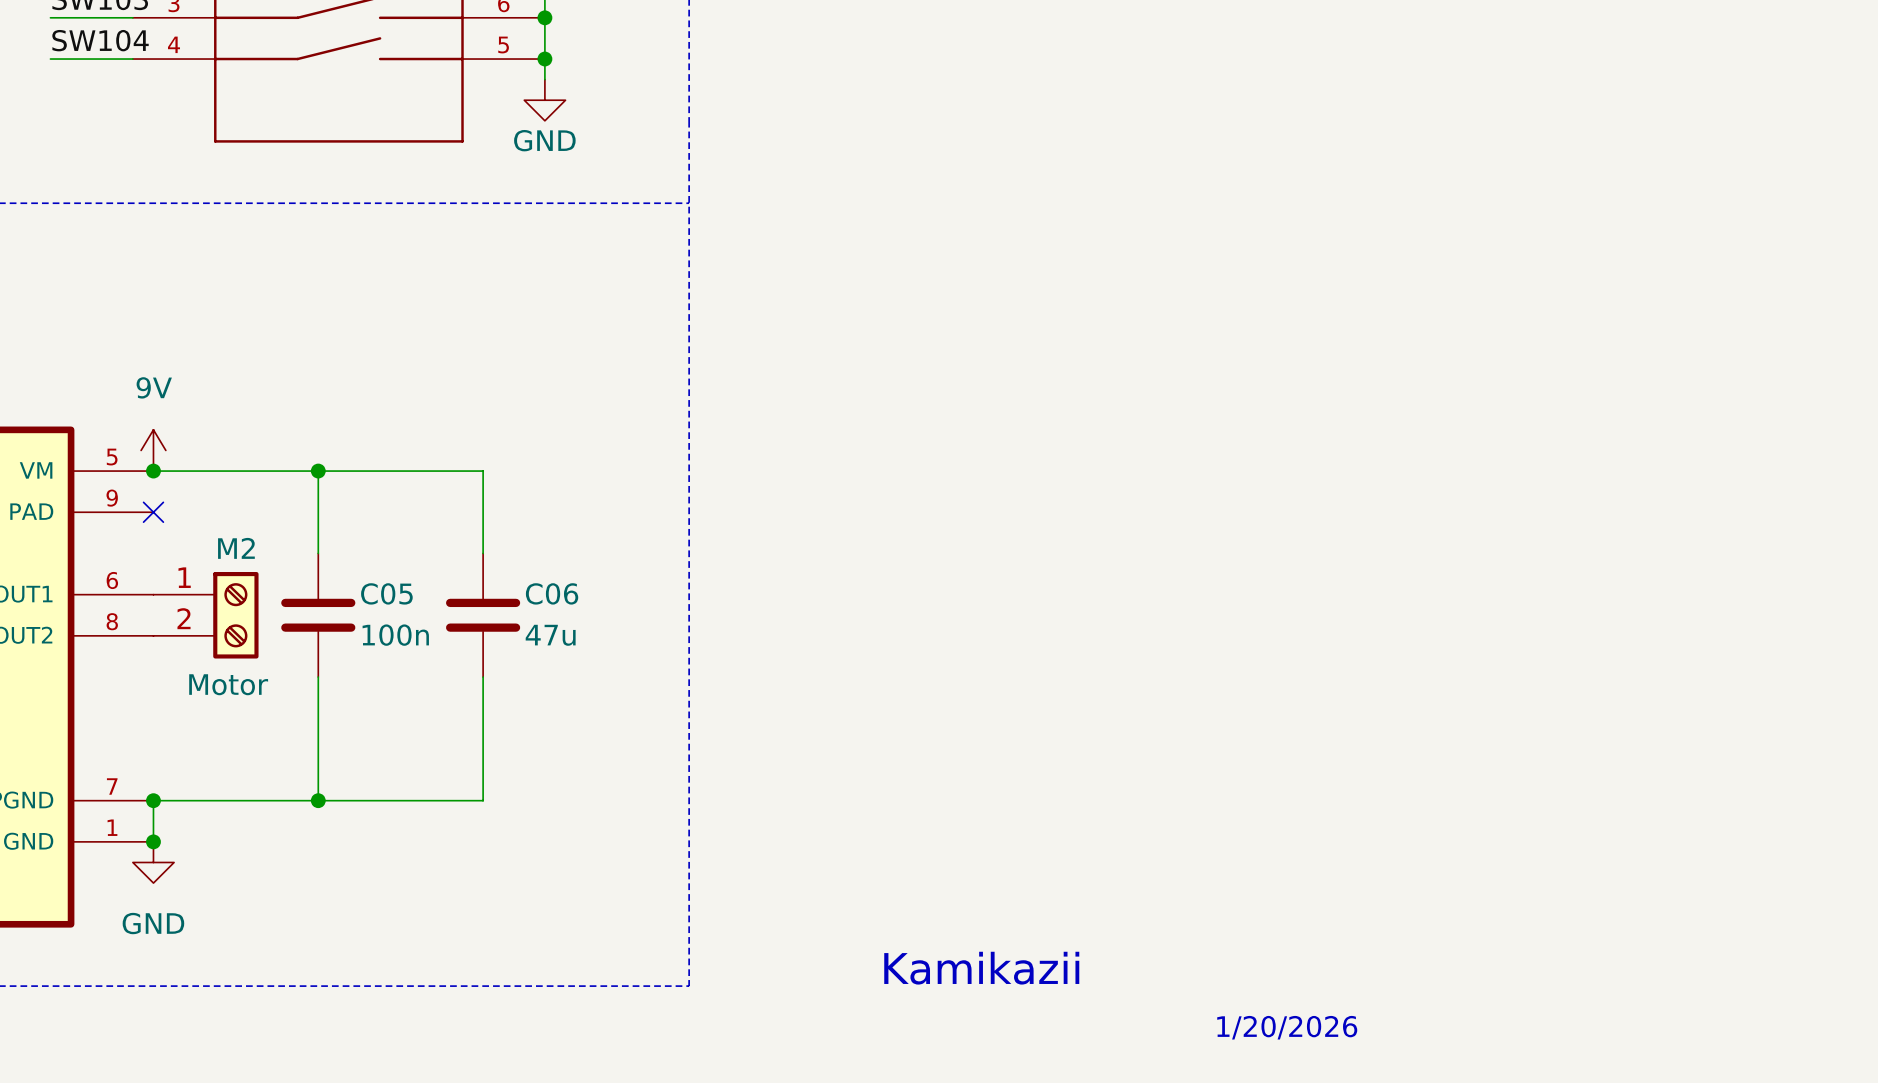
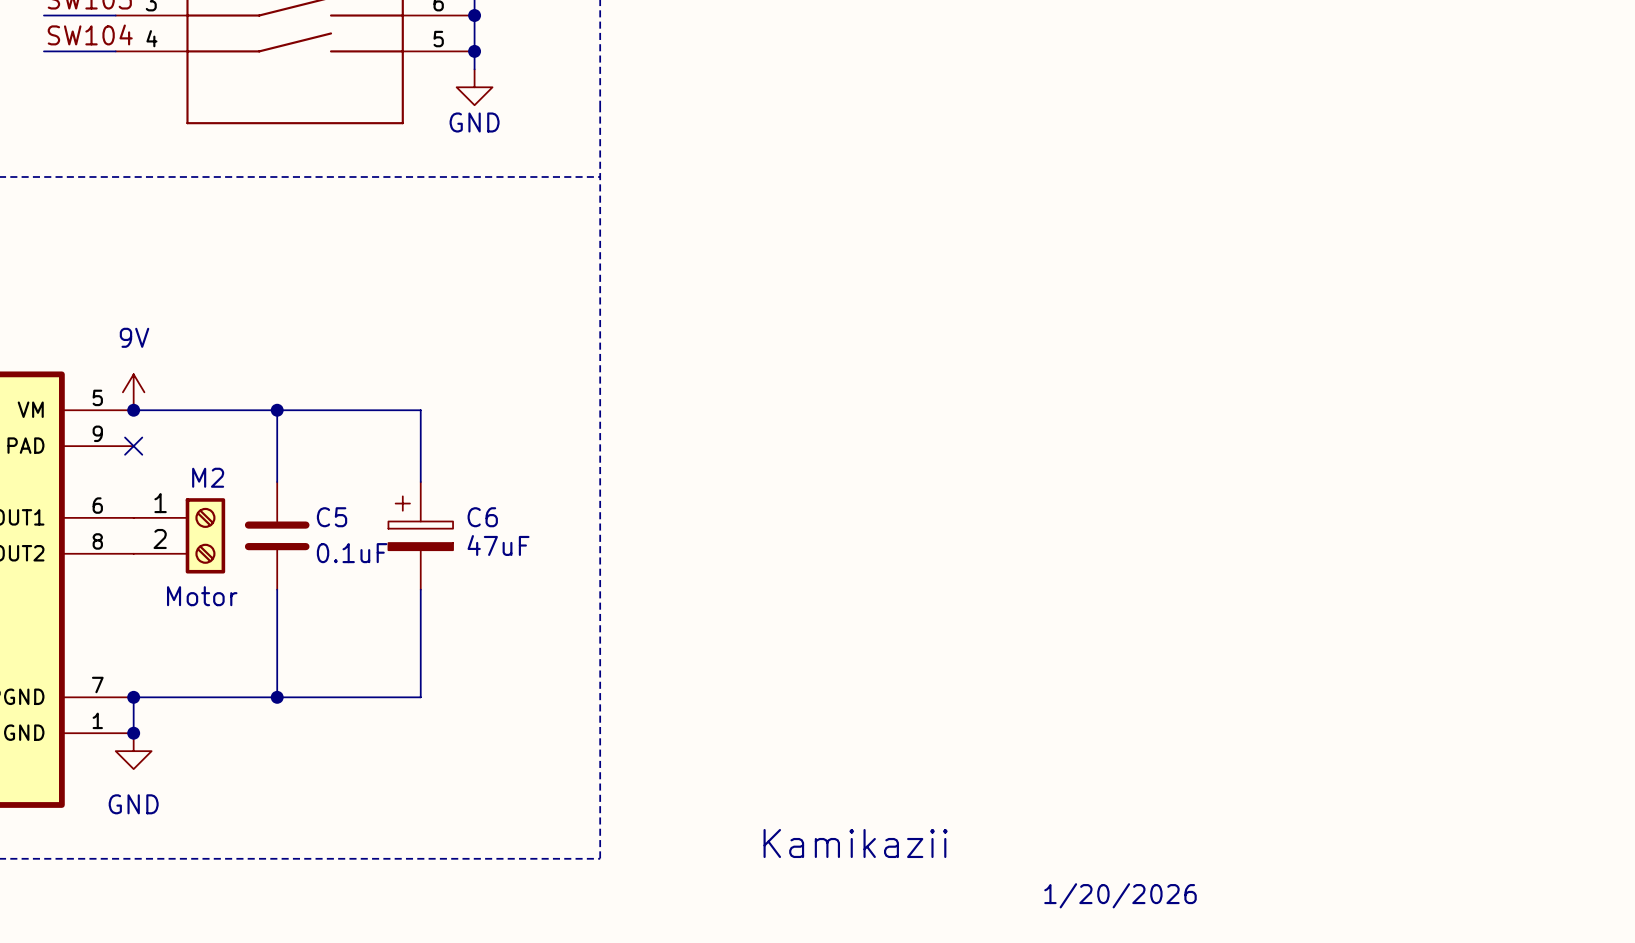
C05 name: C05 (386, 593) -> C5 (332, 517)
C06: 47u (483, 615) -> none
C6: none -> 47uF (420, 535)
C05 value: 100n (395, 635) -> 0.1uF (352, 553)

